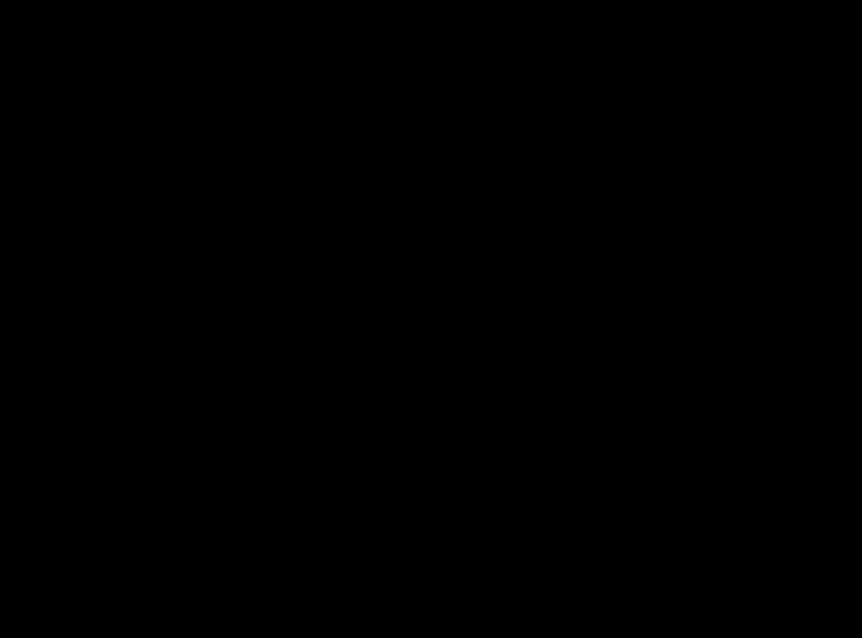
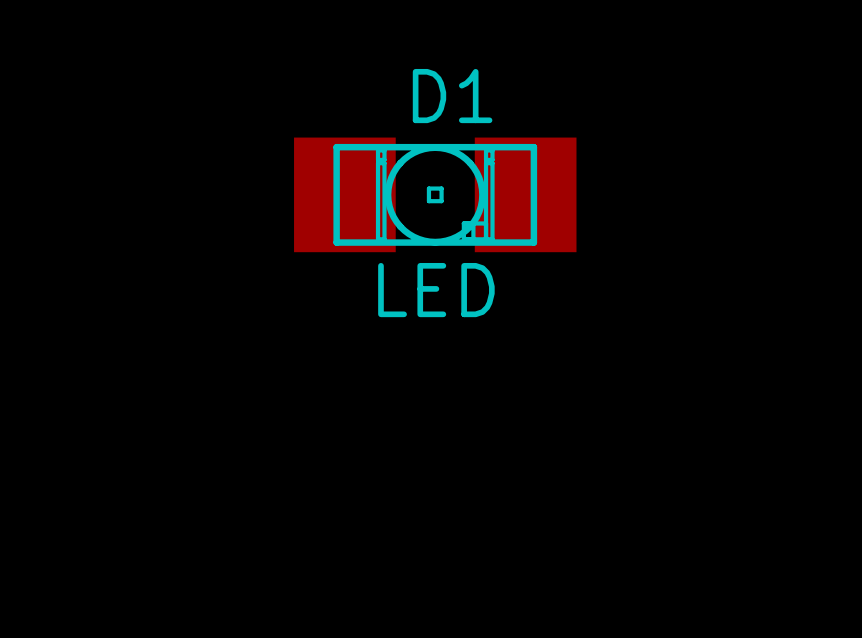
D1: none -> LED (435, 194)

